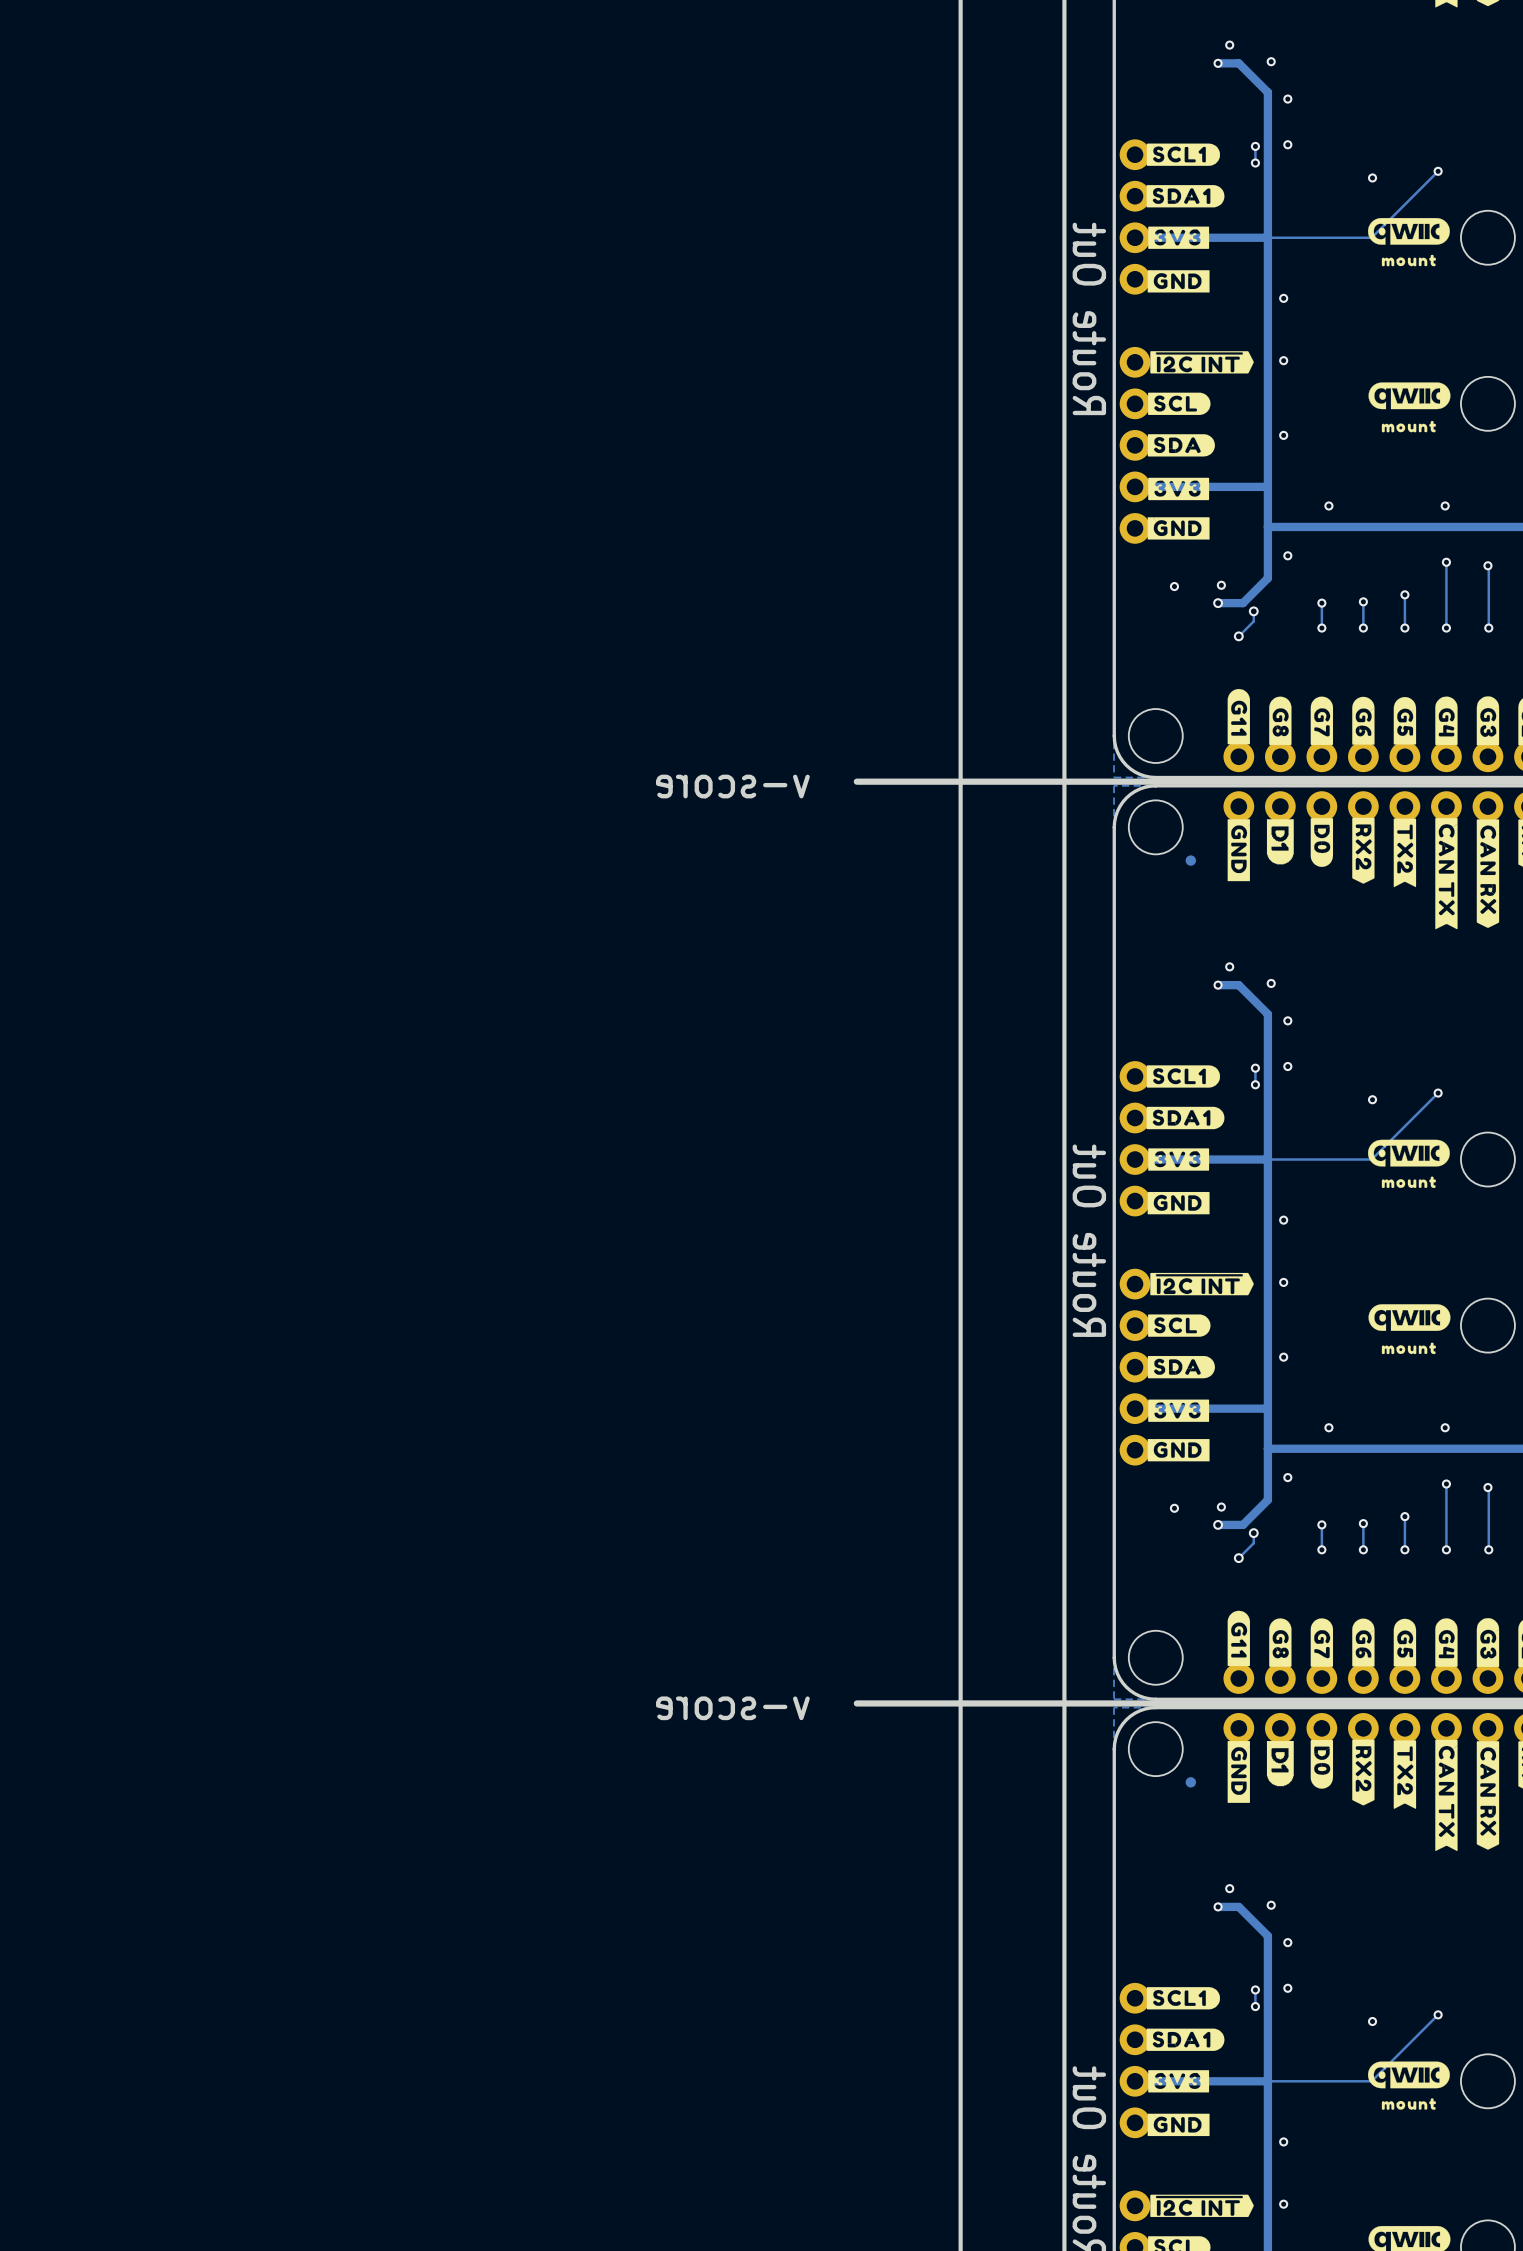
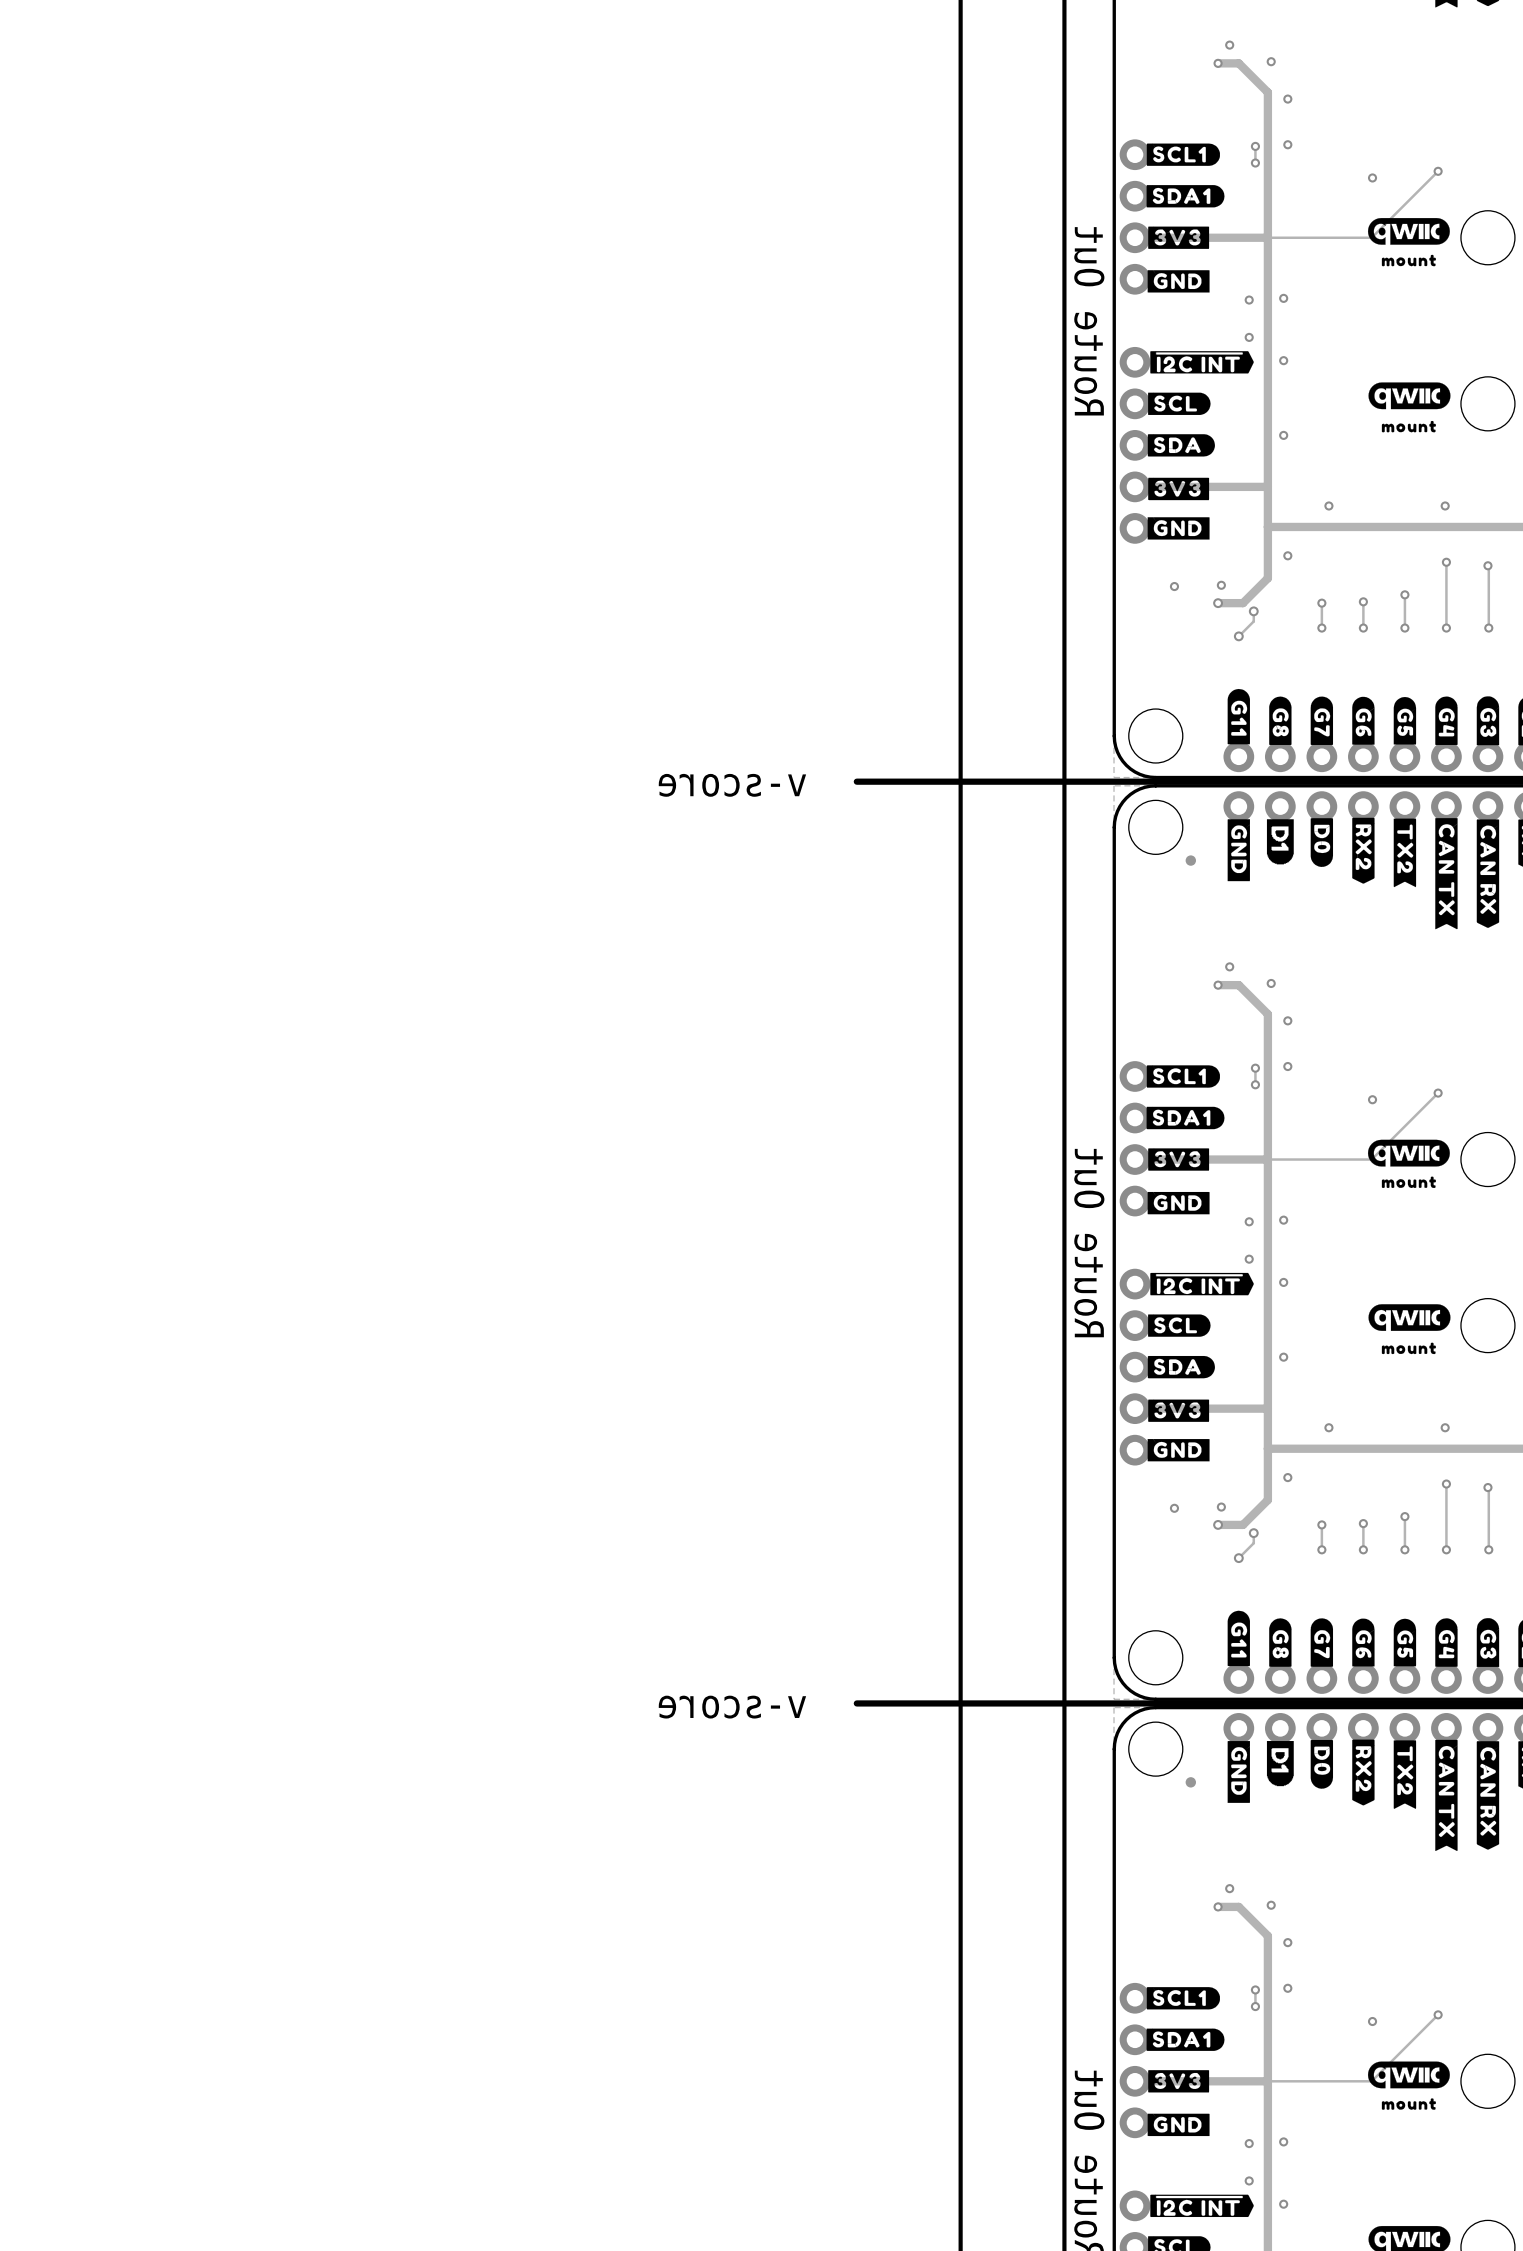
via: none -> (1249, 300)
via: none -> (1249, 337)
via: none -> (1249, 1221)
via: none -> (1249, 1259)
via: none -> (1249, 2143)
via: none -> (1249, 2180)

